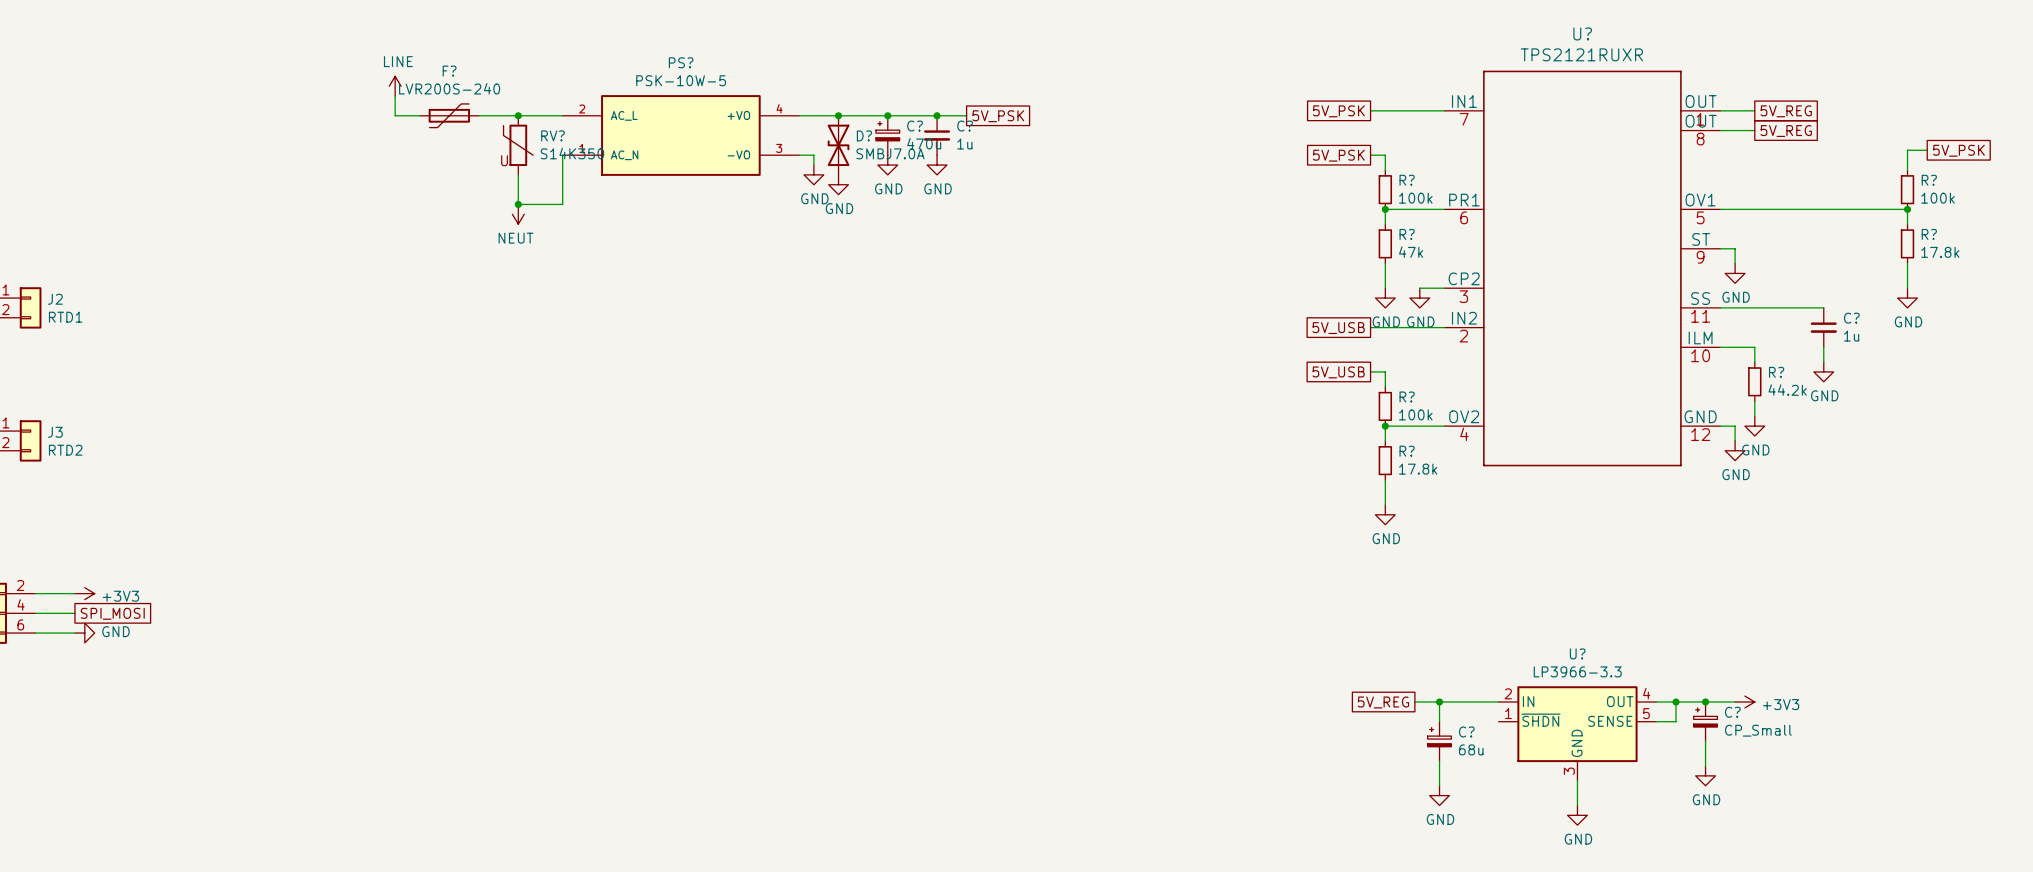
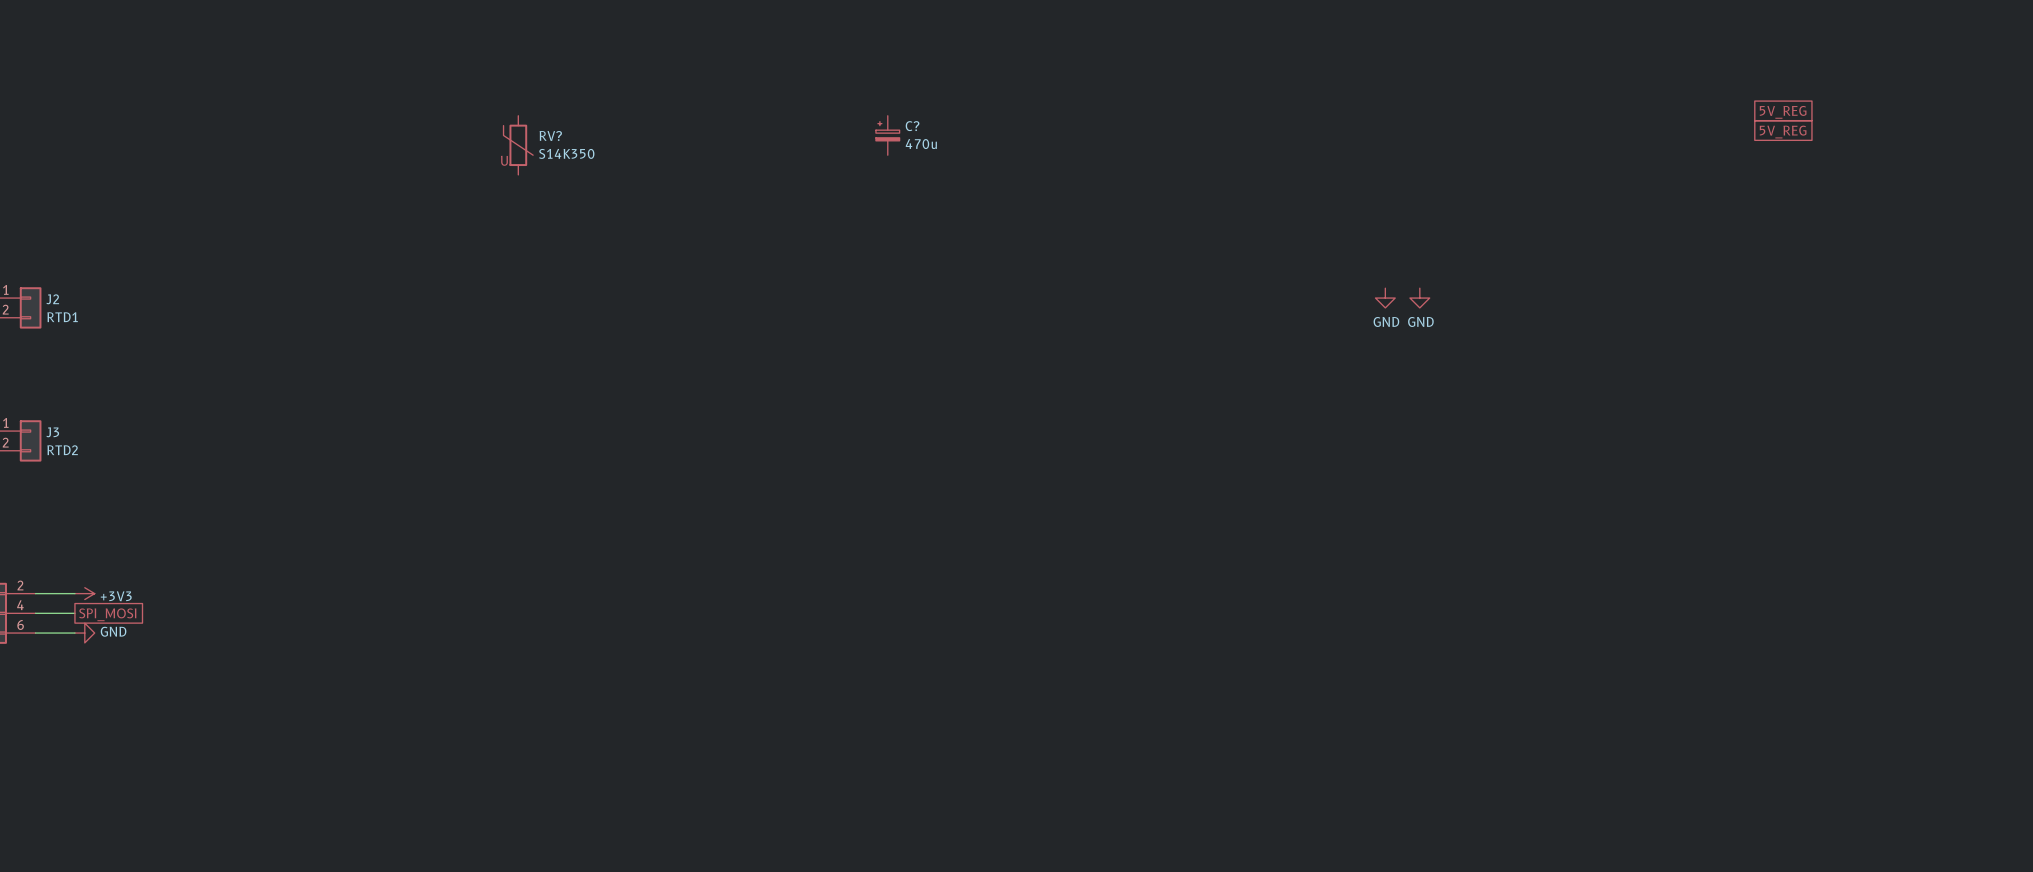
power symbol: LINE (395, 86) -> none
wire: (395, 96) (395, 115) (419, 115) -> none
wire: (1370, 110) (1444, 110) -> none
wire: (1720, 110) (1754, 110) -> none
global label: 5V_PSK (1338, 111) -> none
F?: LVR200S-240 (449, 115) -> none
wire: (478, 115) (562, 115) -> none
junction: (518, 115) -> none
wire: (799, 115) (966, 115) -> none
junction: (838, 115) -> none
junction: (887, 115) -> none
junction: (937, 115) -> none
global label: 5V_PSK (998, 116) -> none
wire: (1720, 130) (1754, 130) -> none
PS?: PSK-10W-5 (680, 135) -> none
C?: 1u (937, 135) -> none
D?: SMBJ7.0A (838, 145) -> none
wire: (1927, 150) (1907, 150) (1907, 169) -> none
global label: 5V_PSK (1958, 150) -> none
wire: (562, 155) (562, 204) (518, 204) (518, 174) -> none
wire: (799, 155) (813, 155) (813, 165) -> none
global label: 5V_PSK (1338, 155) -> none
wire: (1370, 155) (1385, 155) (1385, 169) -> none
power symbol: GND (887, 165) -> none
power symbol: GND (937, 165) -> none
power symbol: GND (813, 174) -> none
power symbol: GND (838, 184) -> none
R?: 100k (1385, 189) -> none
R?: 100k (1907, 189) -> none
junction: (518, 204) -> none
junction: (1385, 209) -> none
wire: (1444, 209) (1385, 209) (1385, 224) -> none
wire: (1720, 209) (1907, 209) (1907, 224) -> none
junction: (1907, 209) -> none
power symbol: NEUT (518, 214) -> none
R?: 47k (1385, 243) -> none
R?: 17.8k (1907, 243) -> none
wire: (1720, 248) (1735, 248) (1735, 263) -> none
wire: (1385, 263) (1385, 288) -> none
wire: (1907, 263) (1907, 288) -> none
U?: TPS2121RUXR (1582, 268) -> none
power symbol: GND (1735, 273) -> none
wire: (1419, 288) (1444, 288) -> none
power symbol: GND (1907, 298) -> none
wire: (1720, 307) (1823, 307) -> none
wire: (1370, 327) (1444, 327) -> none
C?: 1u (1823, 327) -> none
global label: 5V_USB (1338, 328) -> none
wire: (1720, 347) (1754, 347) (1754, 362) -> none
wire: (1823, 347) (1823, 362) -> none
wire: (1370, 371) (1385, 371) (1385, 386) -> none
power symbol: GND (1823, 371) -> none
global label: 5V_USB (1338, 372) -> none
R?: 44.2k (1754, 381) -> none
wire: (1754, 401) (1754, 416) -> none
R?: 100k (1385, 406) -> none
junction: (1385, 426) -> none
wire: (1444, 426) (1385, 426) (1385, 440) -> none
wire: (1720, 426) (1735, 426) (1735, 440) -> none
power symbol: GND (1754, 426) -> none
power symbol: GND (1735, 450) -> none
R?: 17.8k (1385, 460) -> none
wire: (1385, 480) (1385, 504) -> none
power symbol: GND (1385, 514) -> none
global label: 5V_REG (1383, 702) -> none
wire: (1414, 702) (1498, 702) -> none
wire: (1439, 702) (1439, 721) -> none
junction: (1439, 702) -> none
wire: (1656, 702) (1735, 702) -> none
wire: (1675, 702) (1675, 721) (1656, 721) -> none
junction: (1675, 702) -> none
junction: (1705, 702) -> none
power symbol: +3V3 (1744, 702) -> none
C?: CP_Small (1705, 721) -> none
U?: LP3966-3.3 (1577, 733) -> none
C?: 68u (1439, 741) -> none
wire: (1705, 741) (1705, 766) -> none
wire: (1439, 761) (1439, 785) -> none
power symbol: GND (1705, 775) -> none
wire: (1577, 780) (1577, 805) -> none
power symbol: GND (1439, 795) -> none
power symbol: GND (1577, 815) -> none

